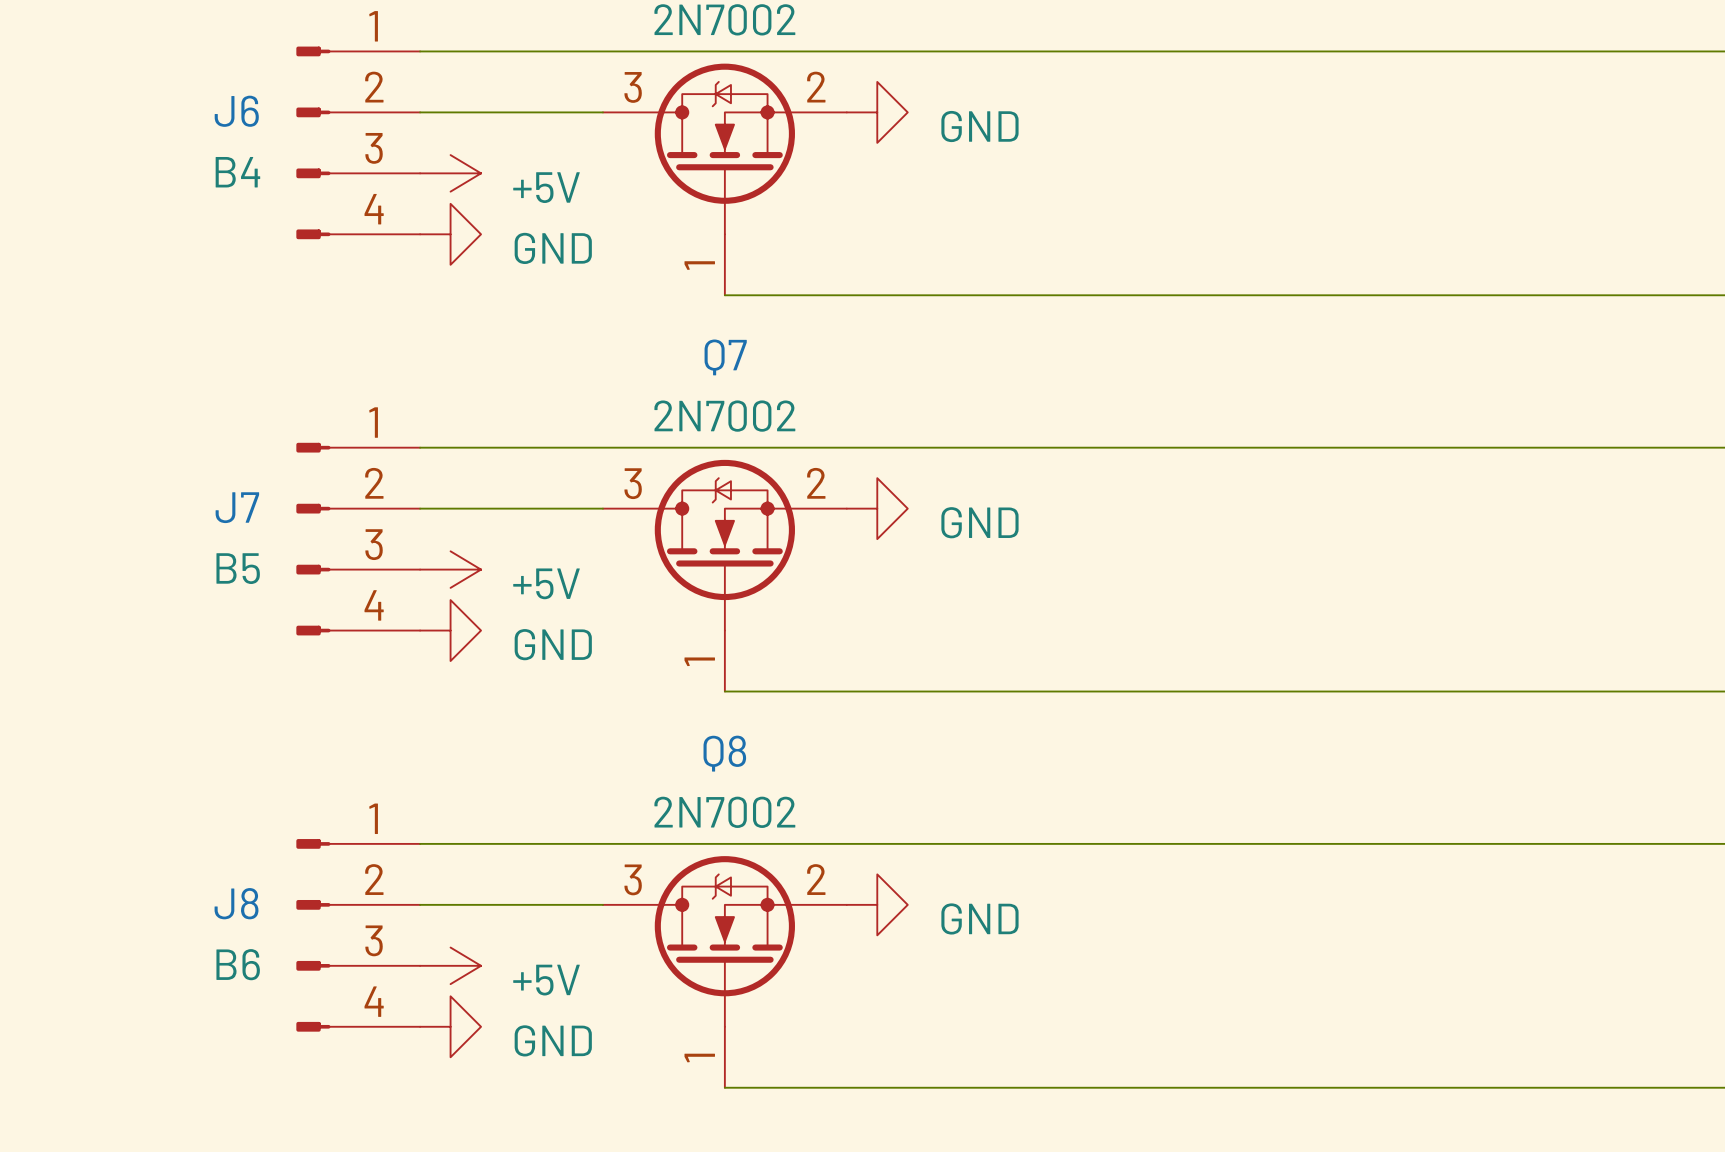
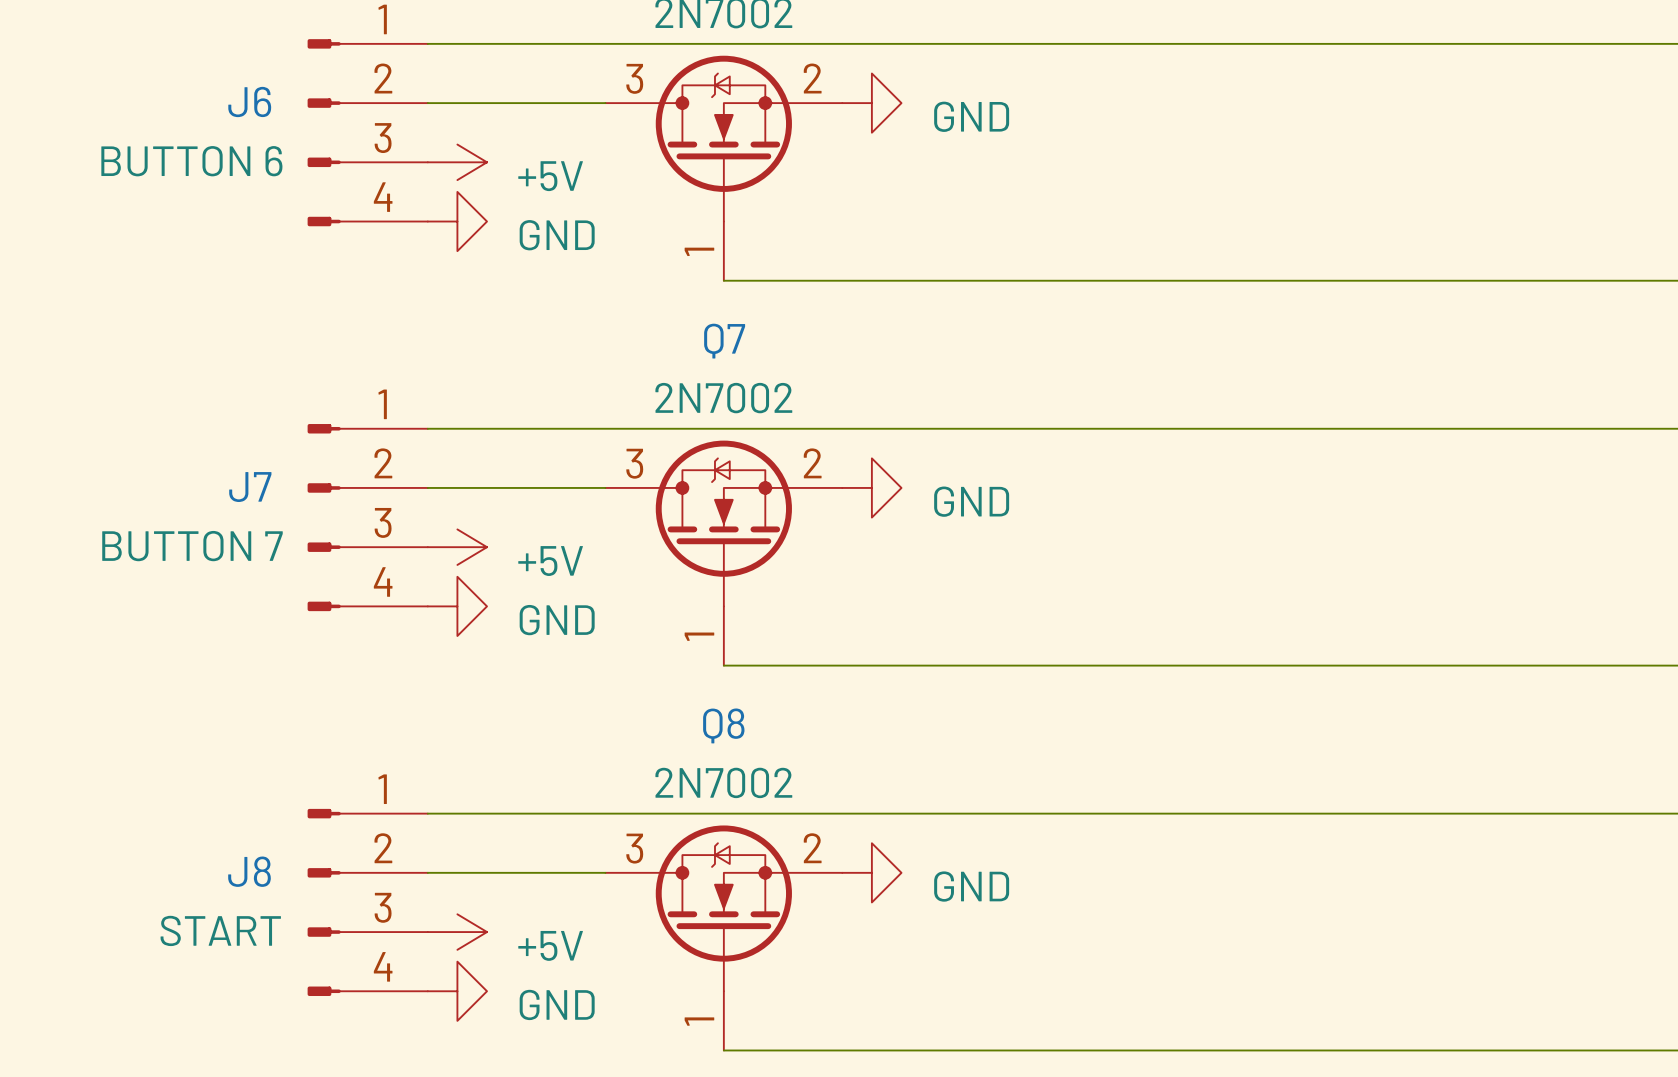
J6 value: B4 (237, 172) -> BUTTON 6 (191, 161)
J7 value: B5 (238, 568) -> BUTTON 7 (192, 546)
J8 value: B6 (238, 964) -> START (220, 930)

